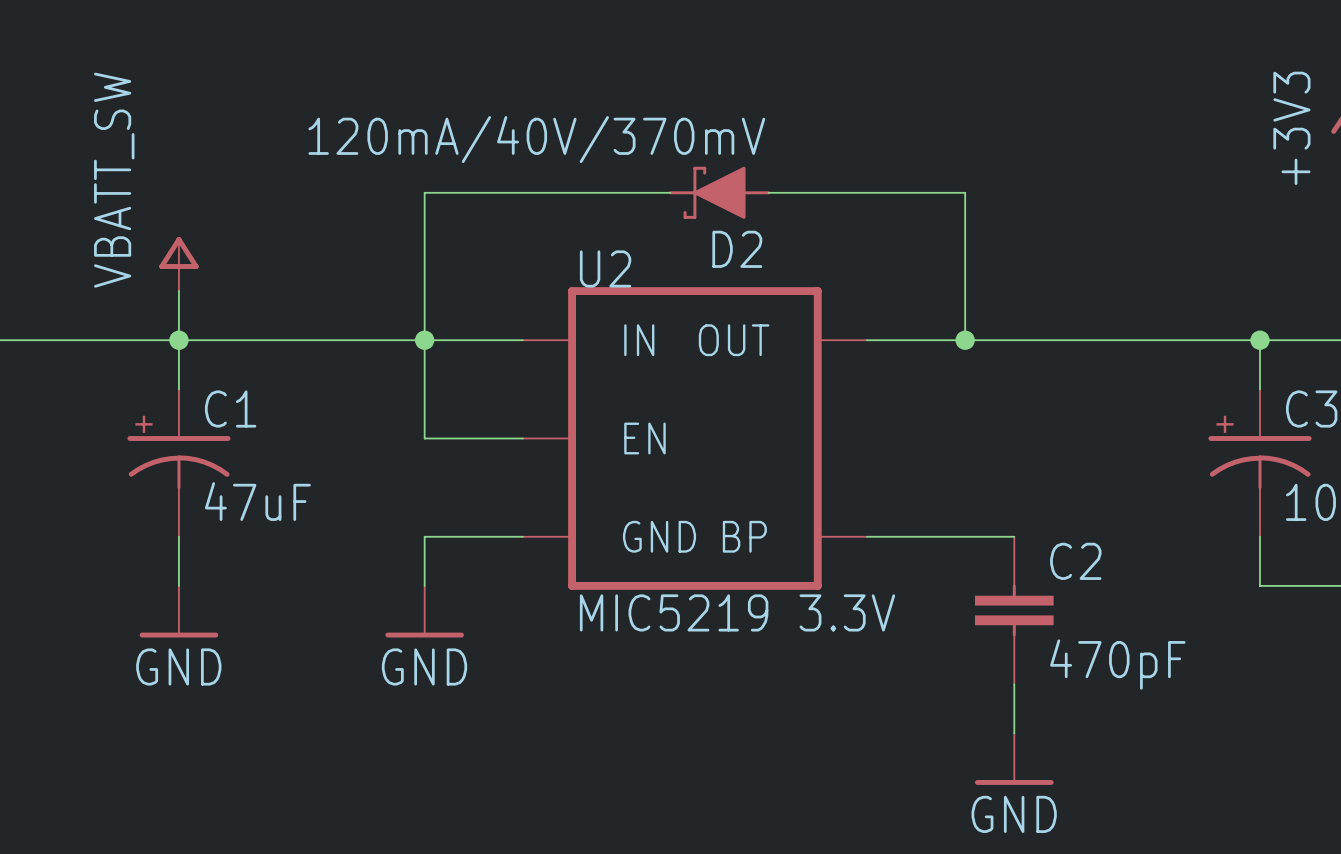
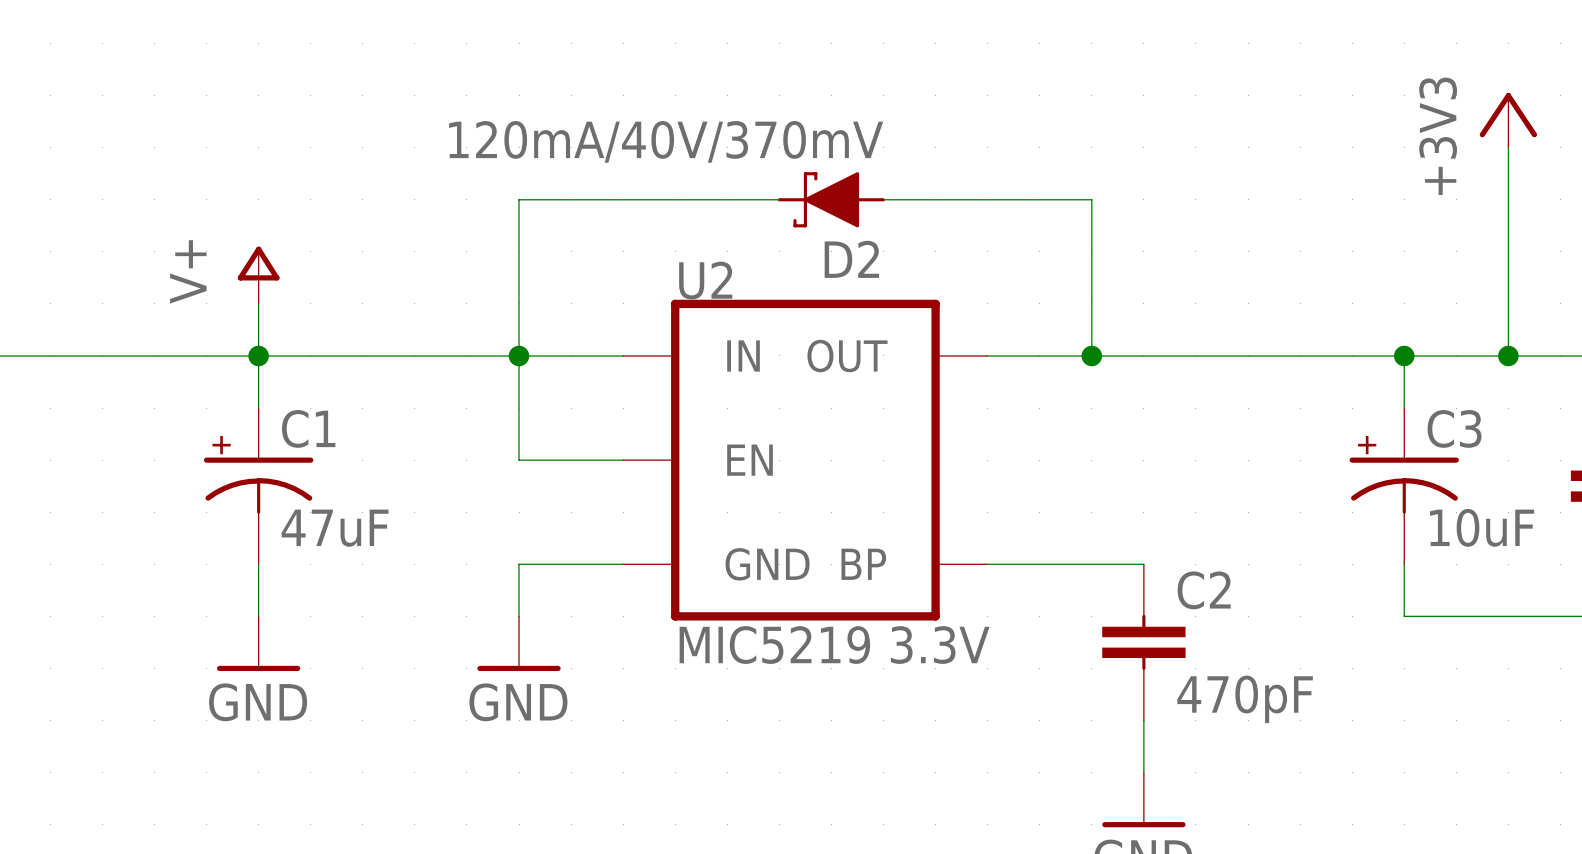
power symbol: VBATT_SW (178, 264) -> V+ (258, 275)

